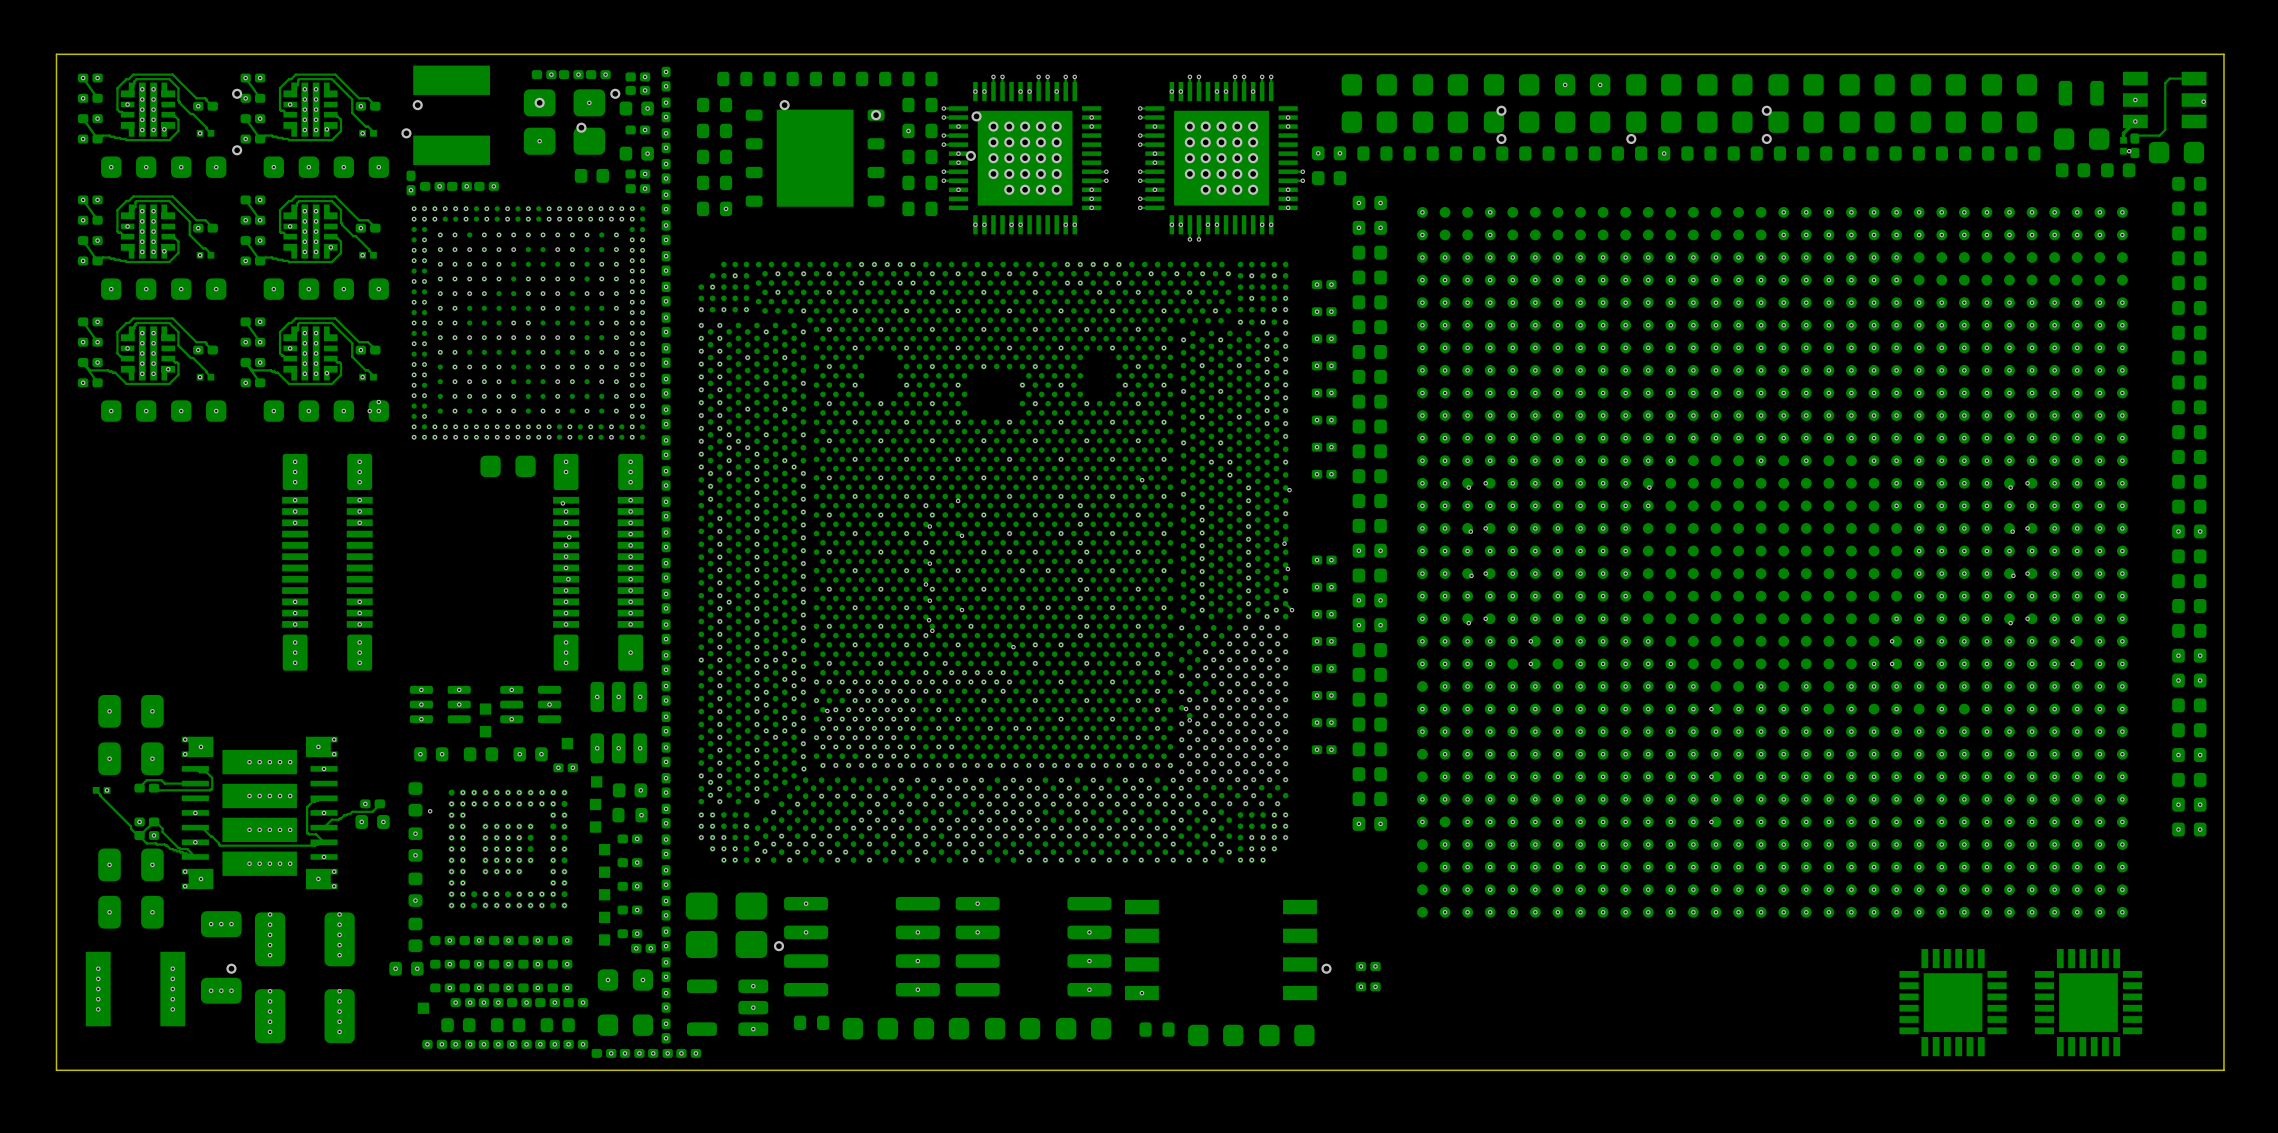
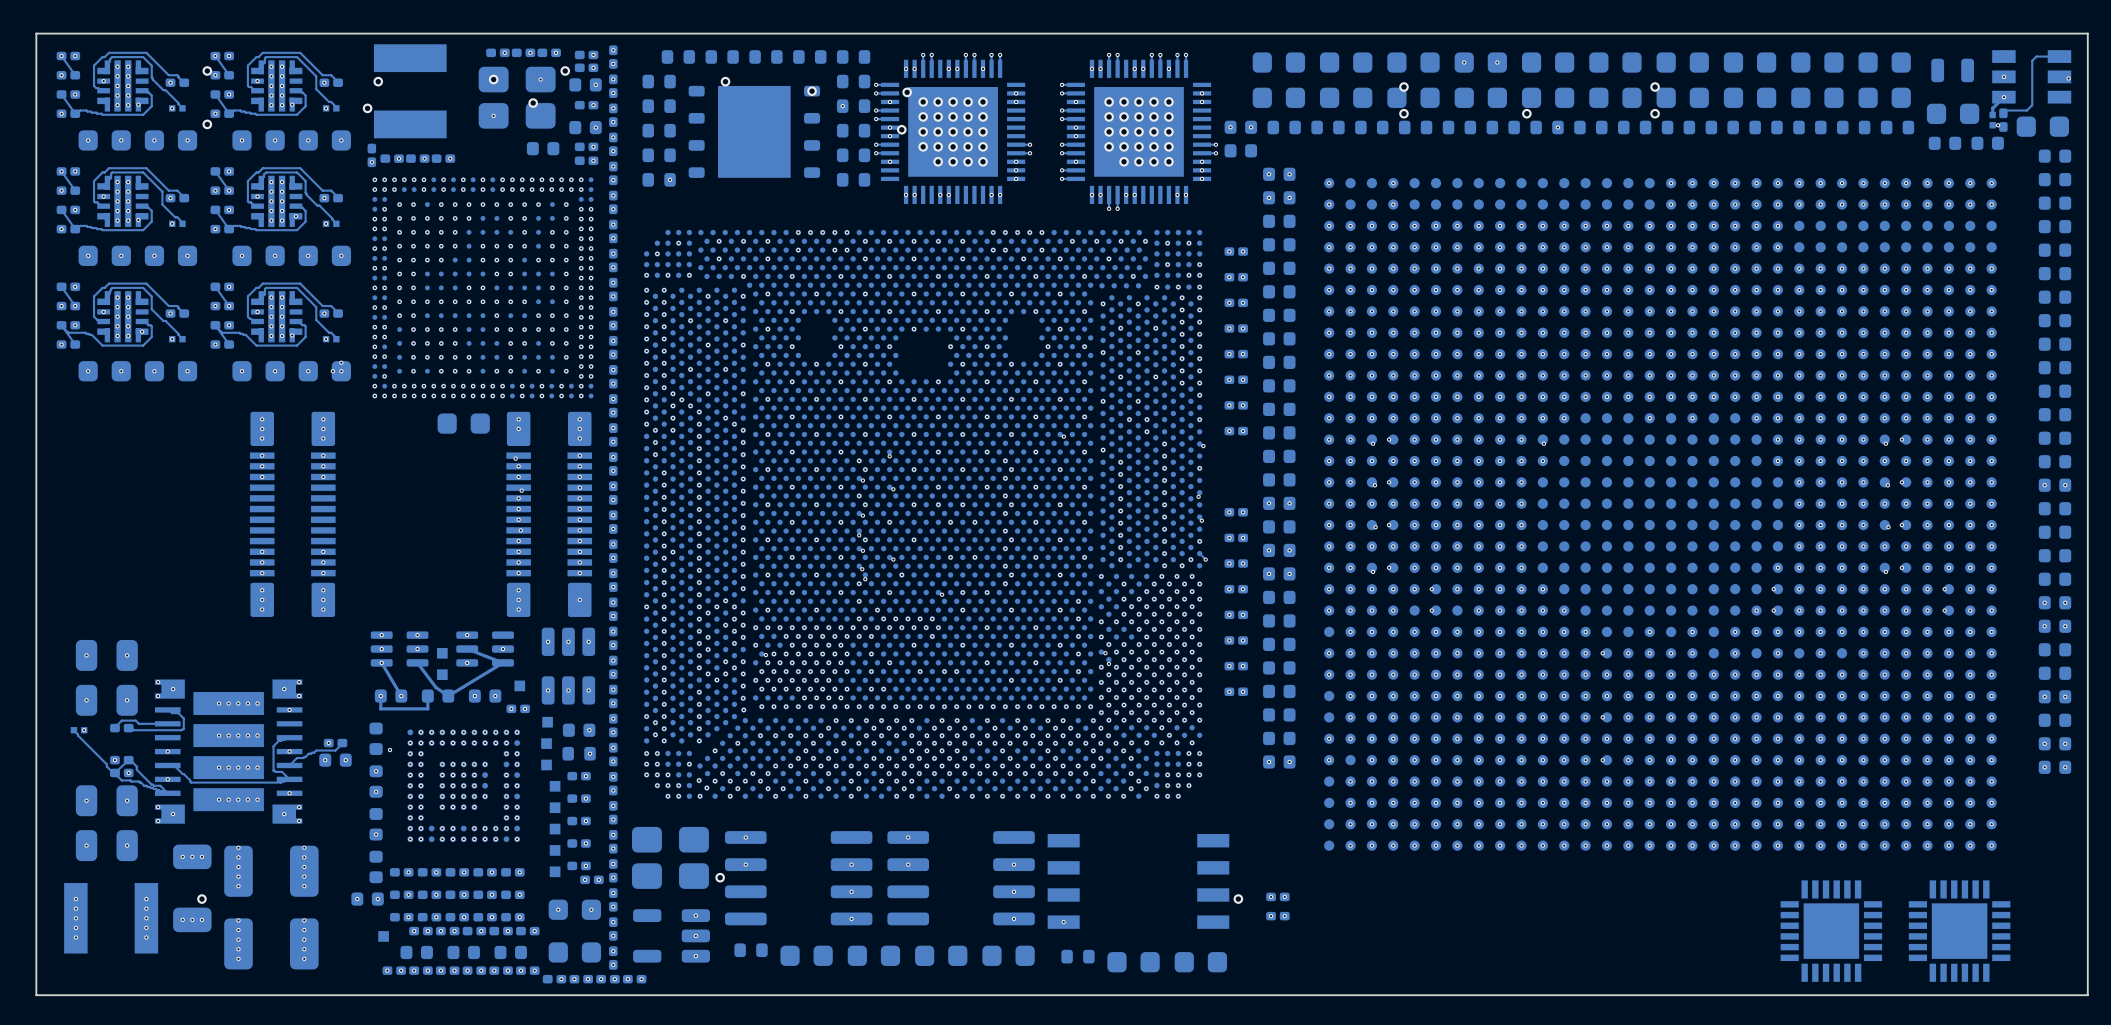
track: none -> (467, 649) (502, 662) (448, 696) (435, 687) (417, 662)
track: none -> (381, 662) (401, 696)
track: none -> (427, 696) (427, 708) (380, 708) (380, 696)

